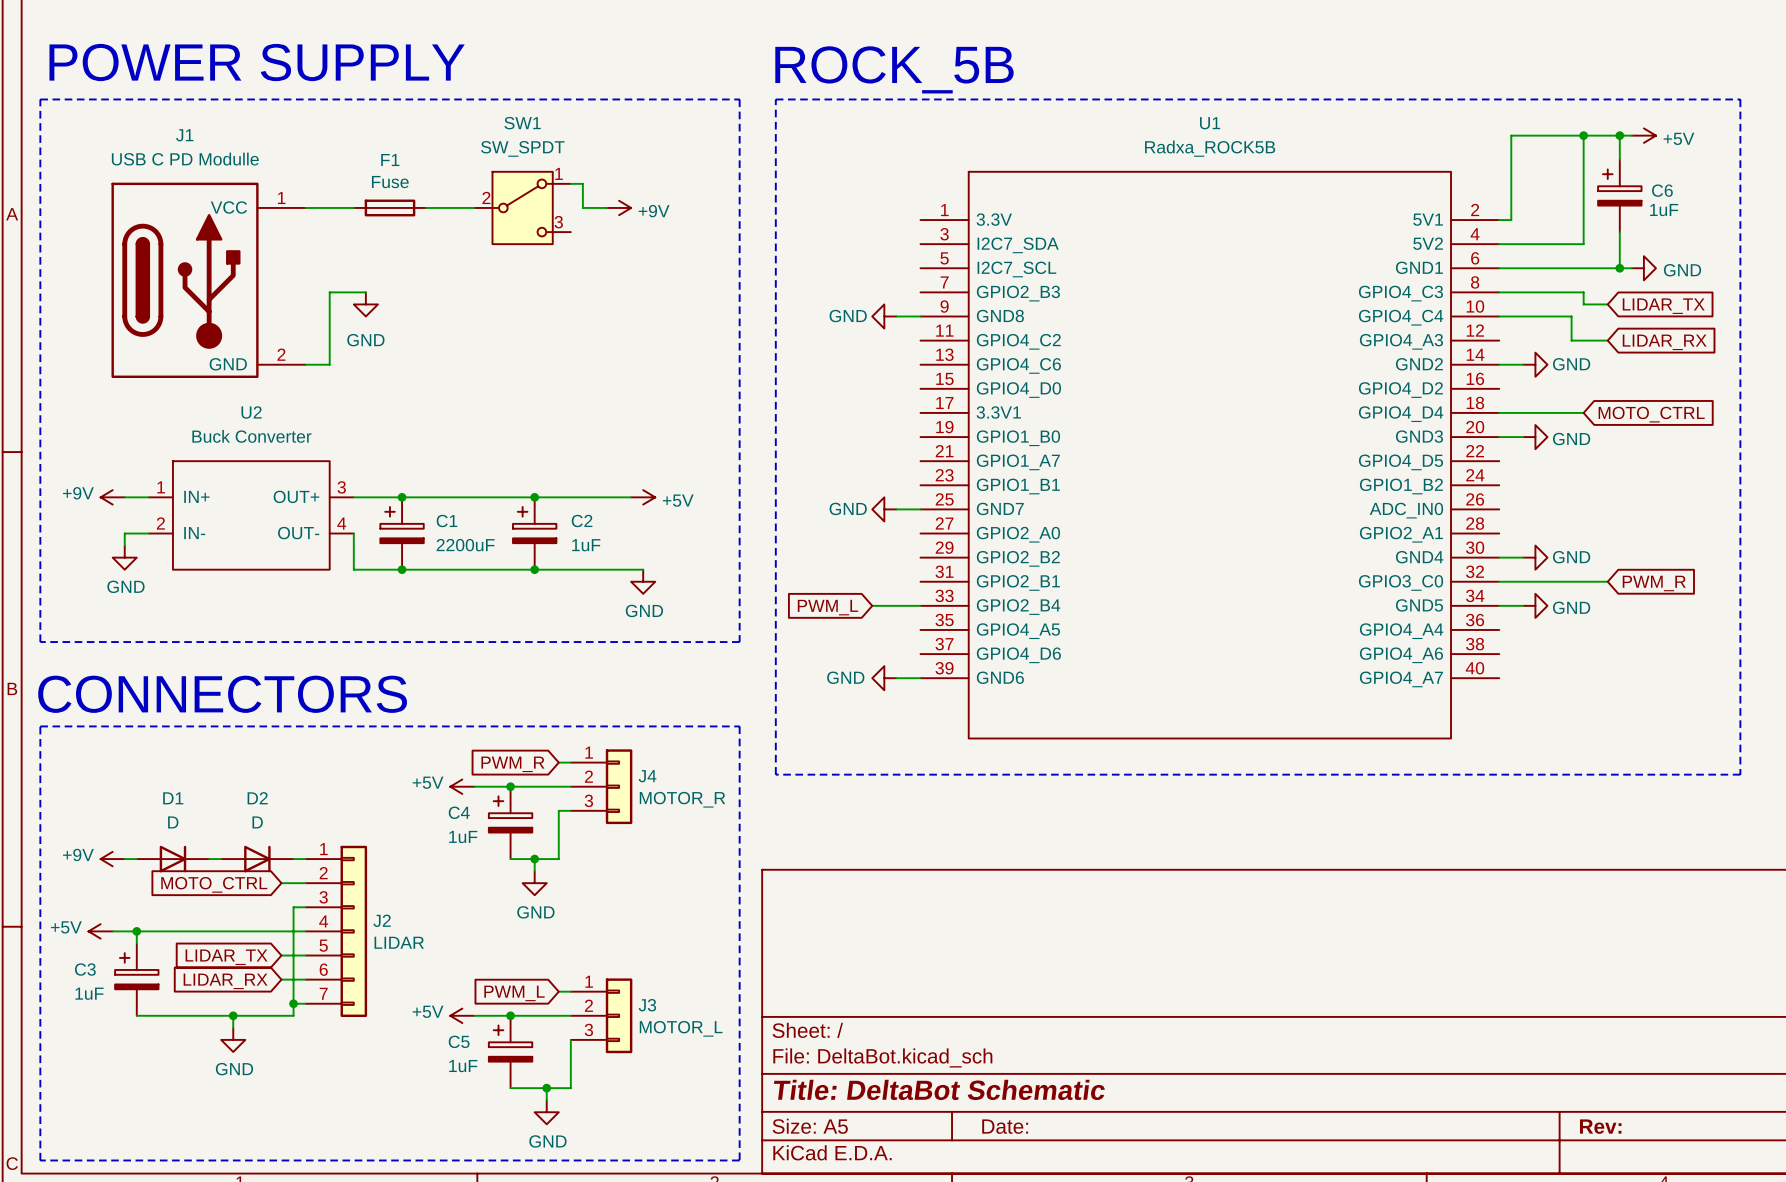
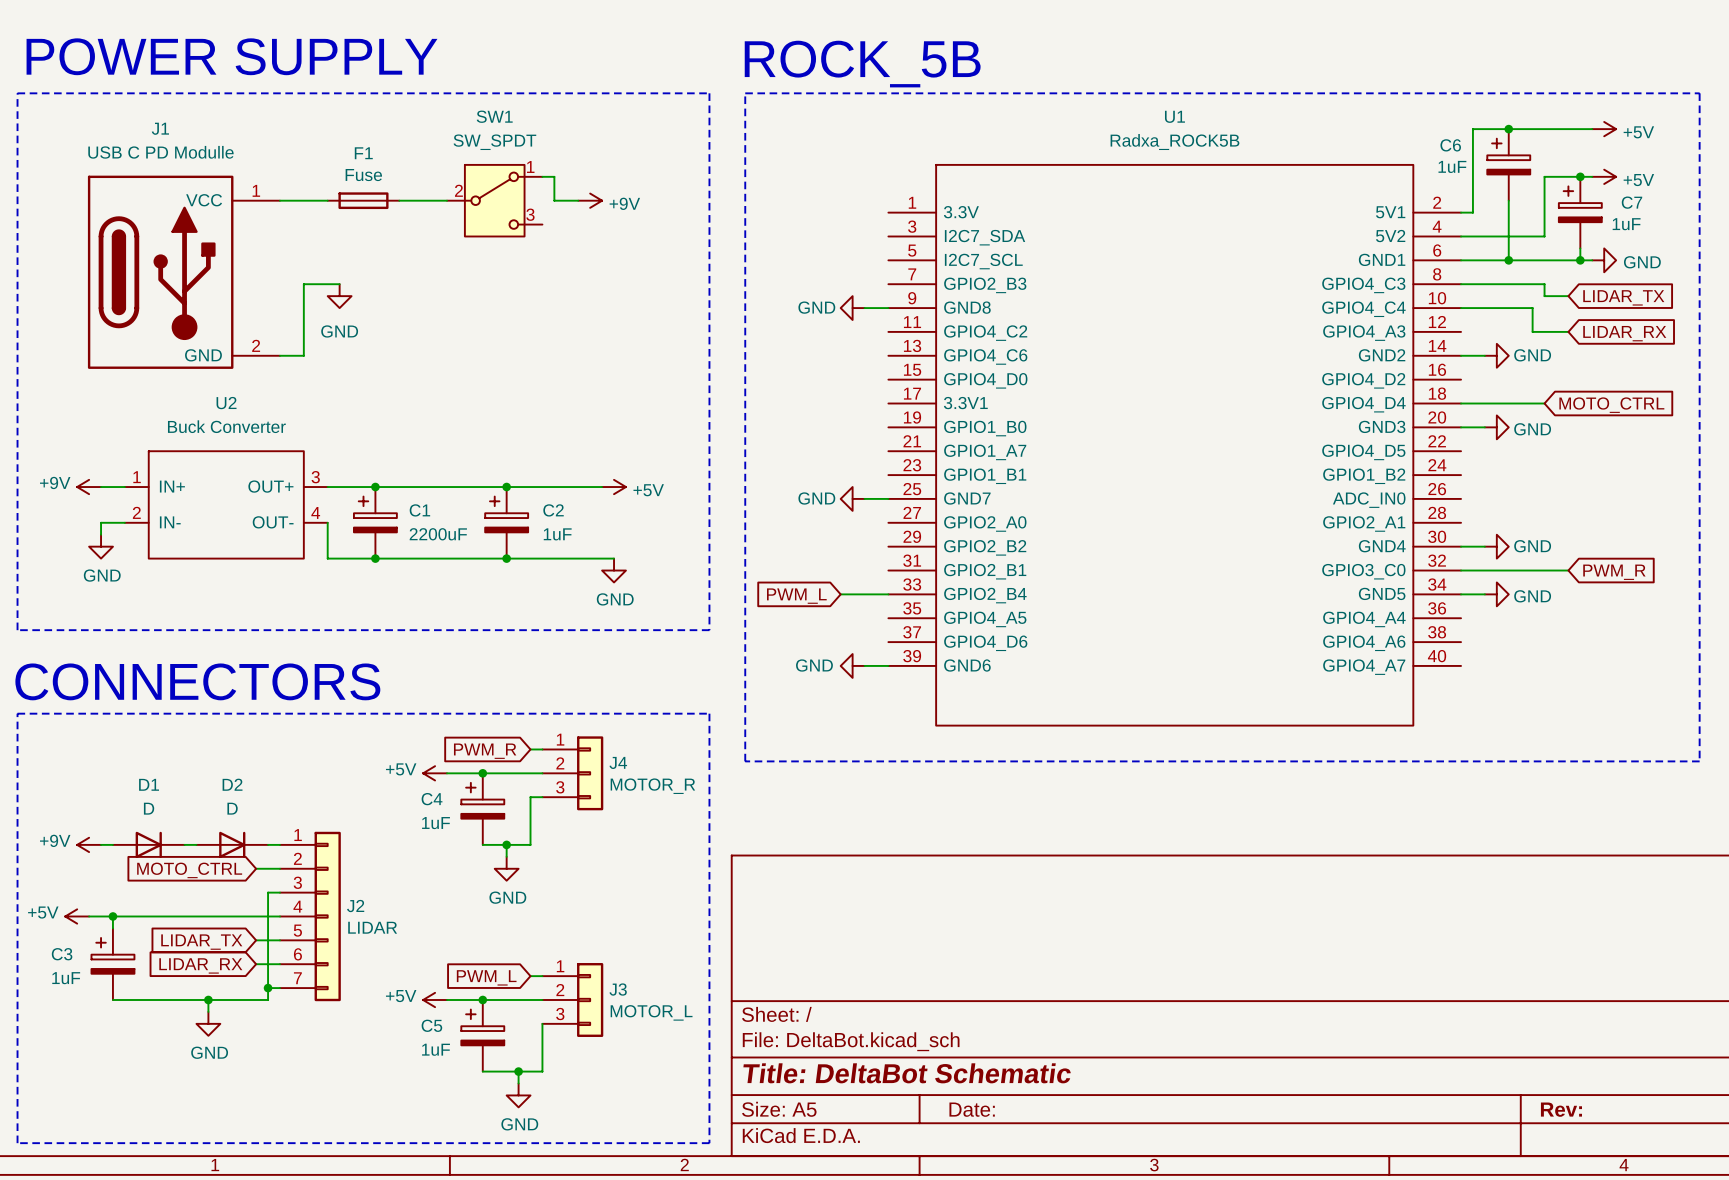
junction: none -> (1508, 129)
wire: (1583, 135) (1583, 183) -> (1592, 176) (1544, 176)
junction: (1583, 135) -> none
wire: (1619, 135) (1619, 159) -> none
junction: (1619, 135) -> none
junction: none -> (1580, 176)
power symbol: none -> +5V (1604, 176)
C6 name position: C6 (1662, 190) -> C6 (1450, 145)
C6 position: (1619, 195) -> (1508, 164)
wire: none -> (1508, 200) (1508, 260)
C6 value position: 1uF (1664, 210) -> 1uF (1452, 166)
C7: none -> 1uF (1580, 212)
junction: none -> (1508, 260)

